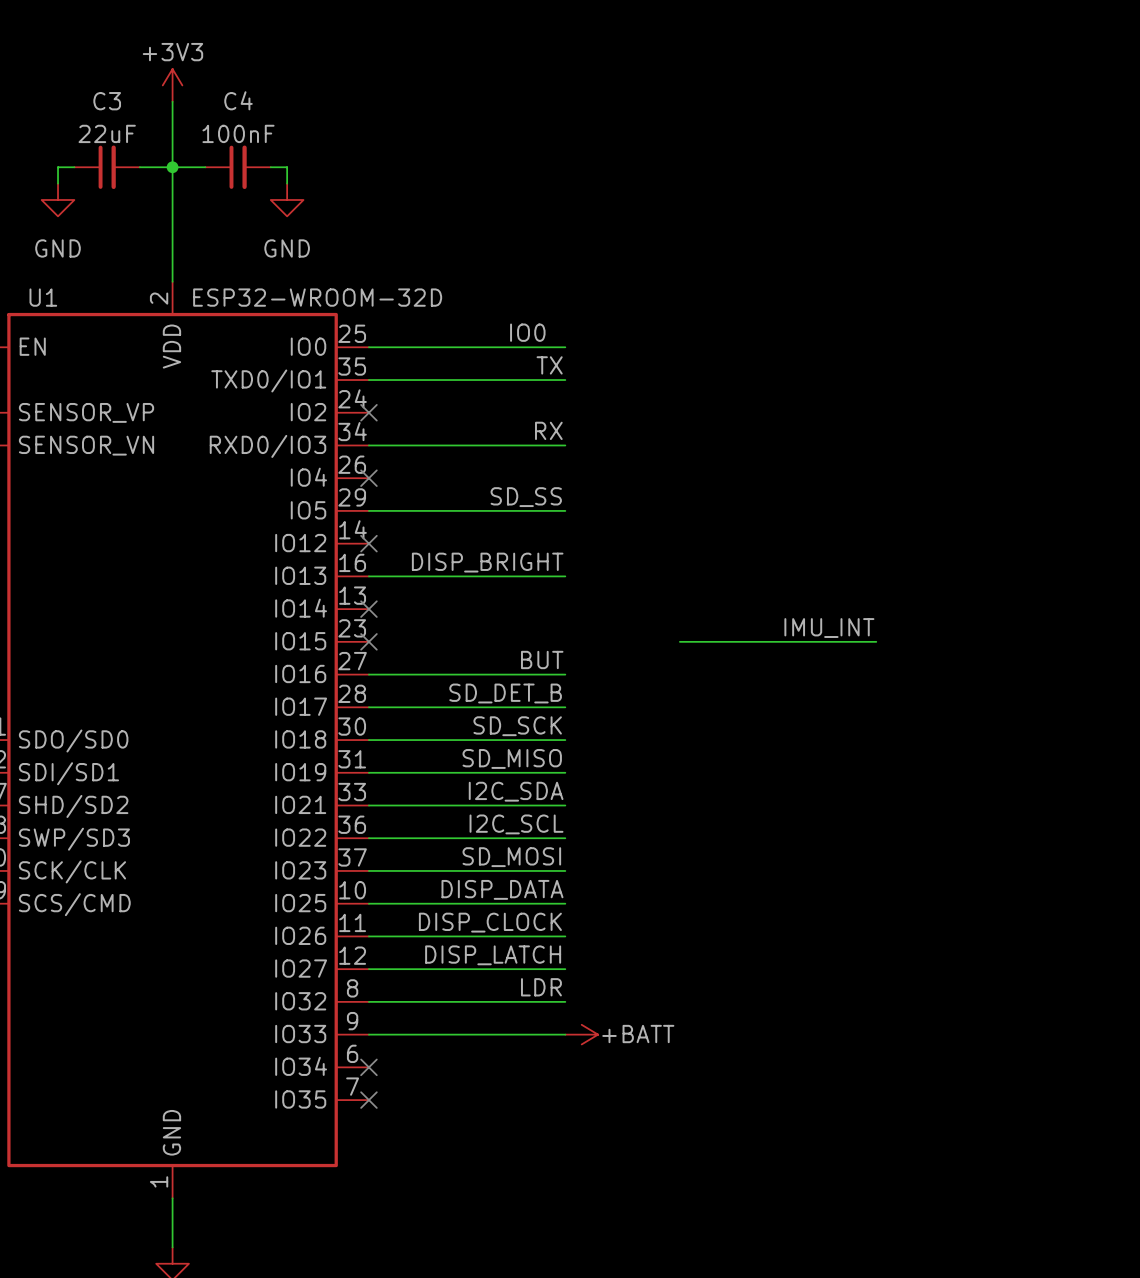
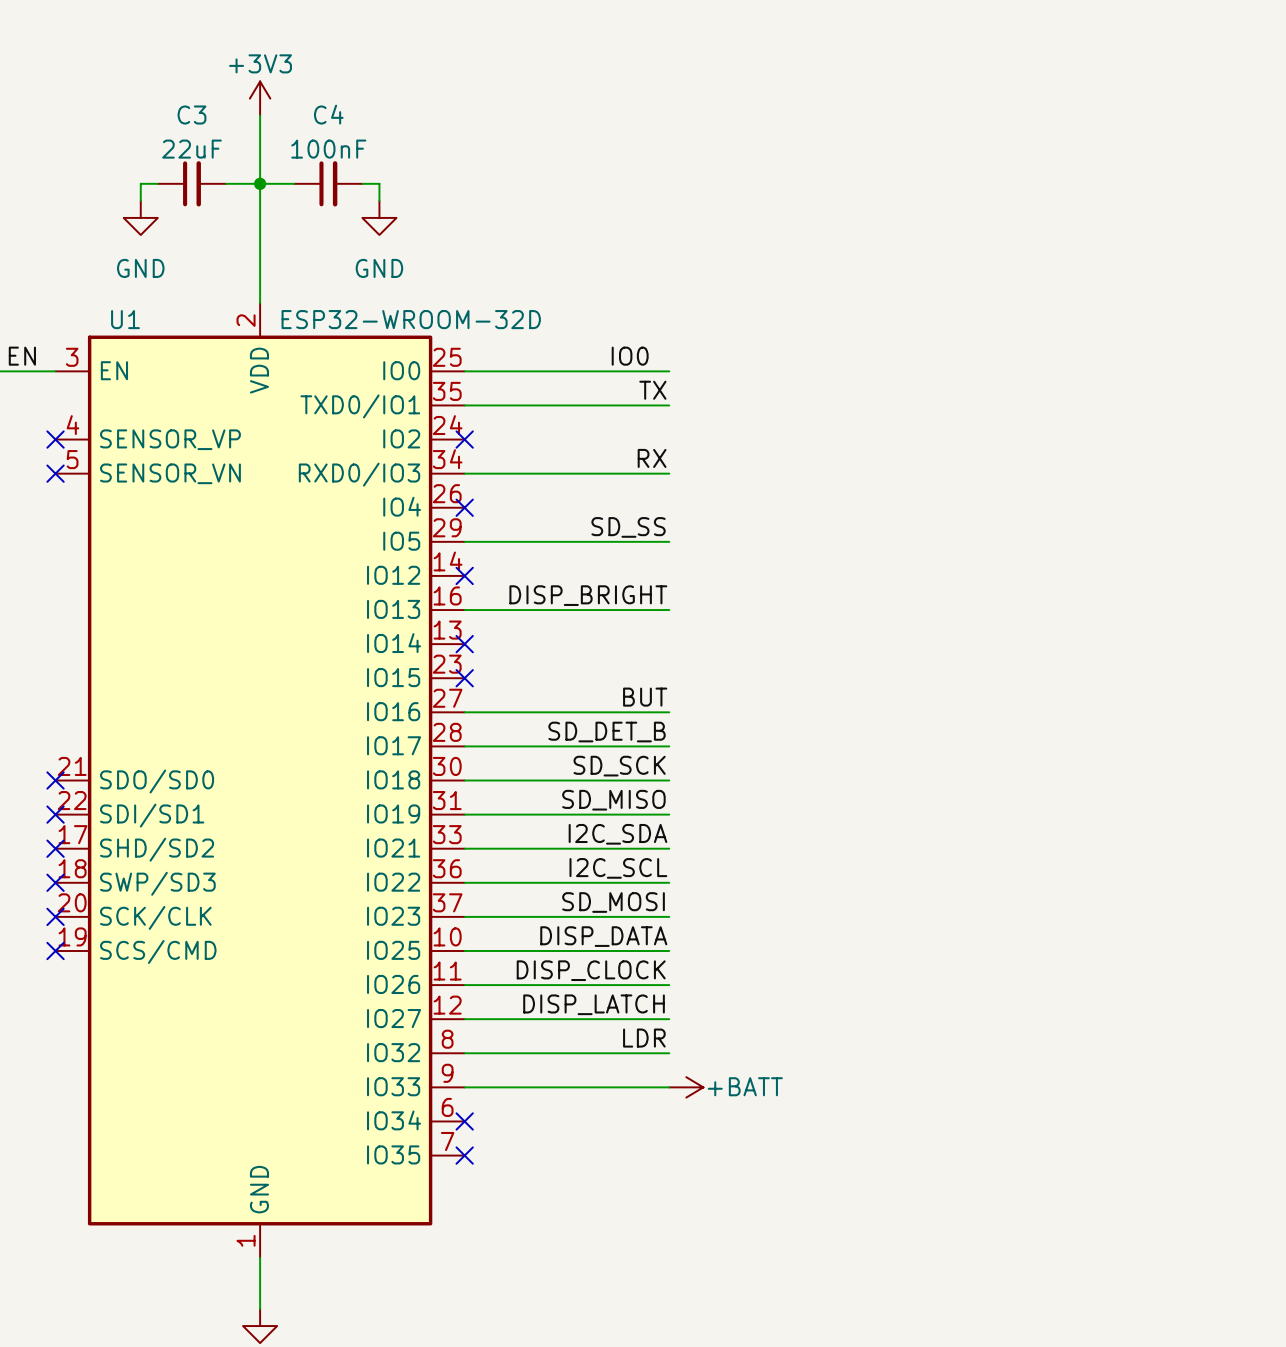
label: IMU_INT (829, 628) -> none
wire: (679, 641) (876, 641) -> none

